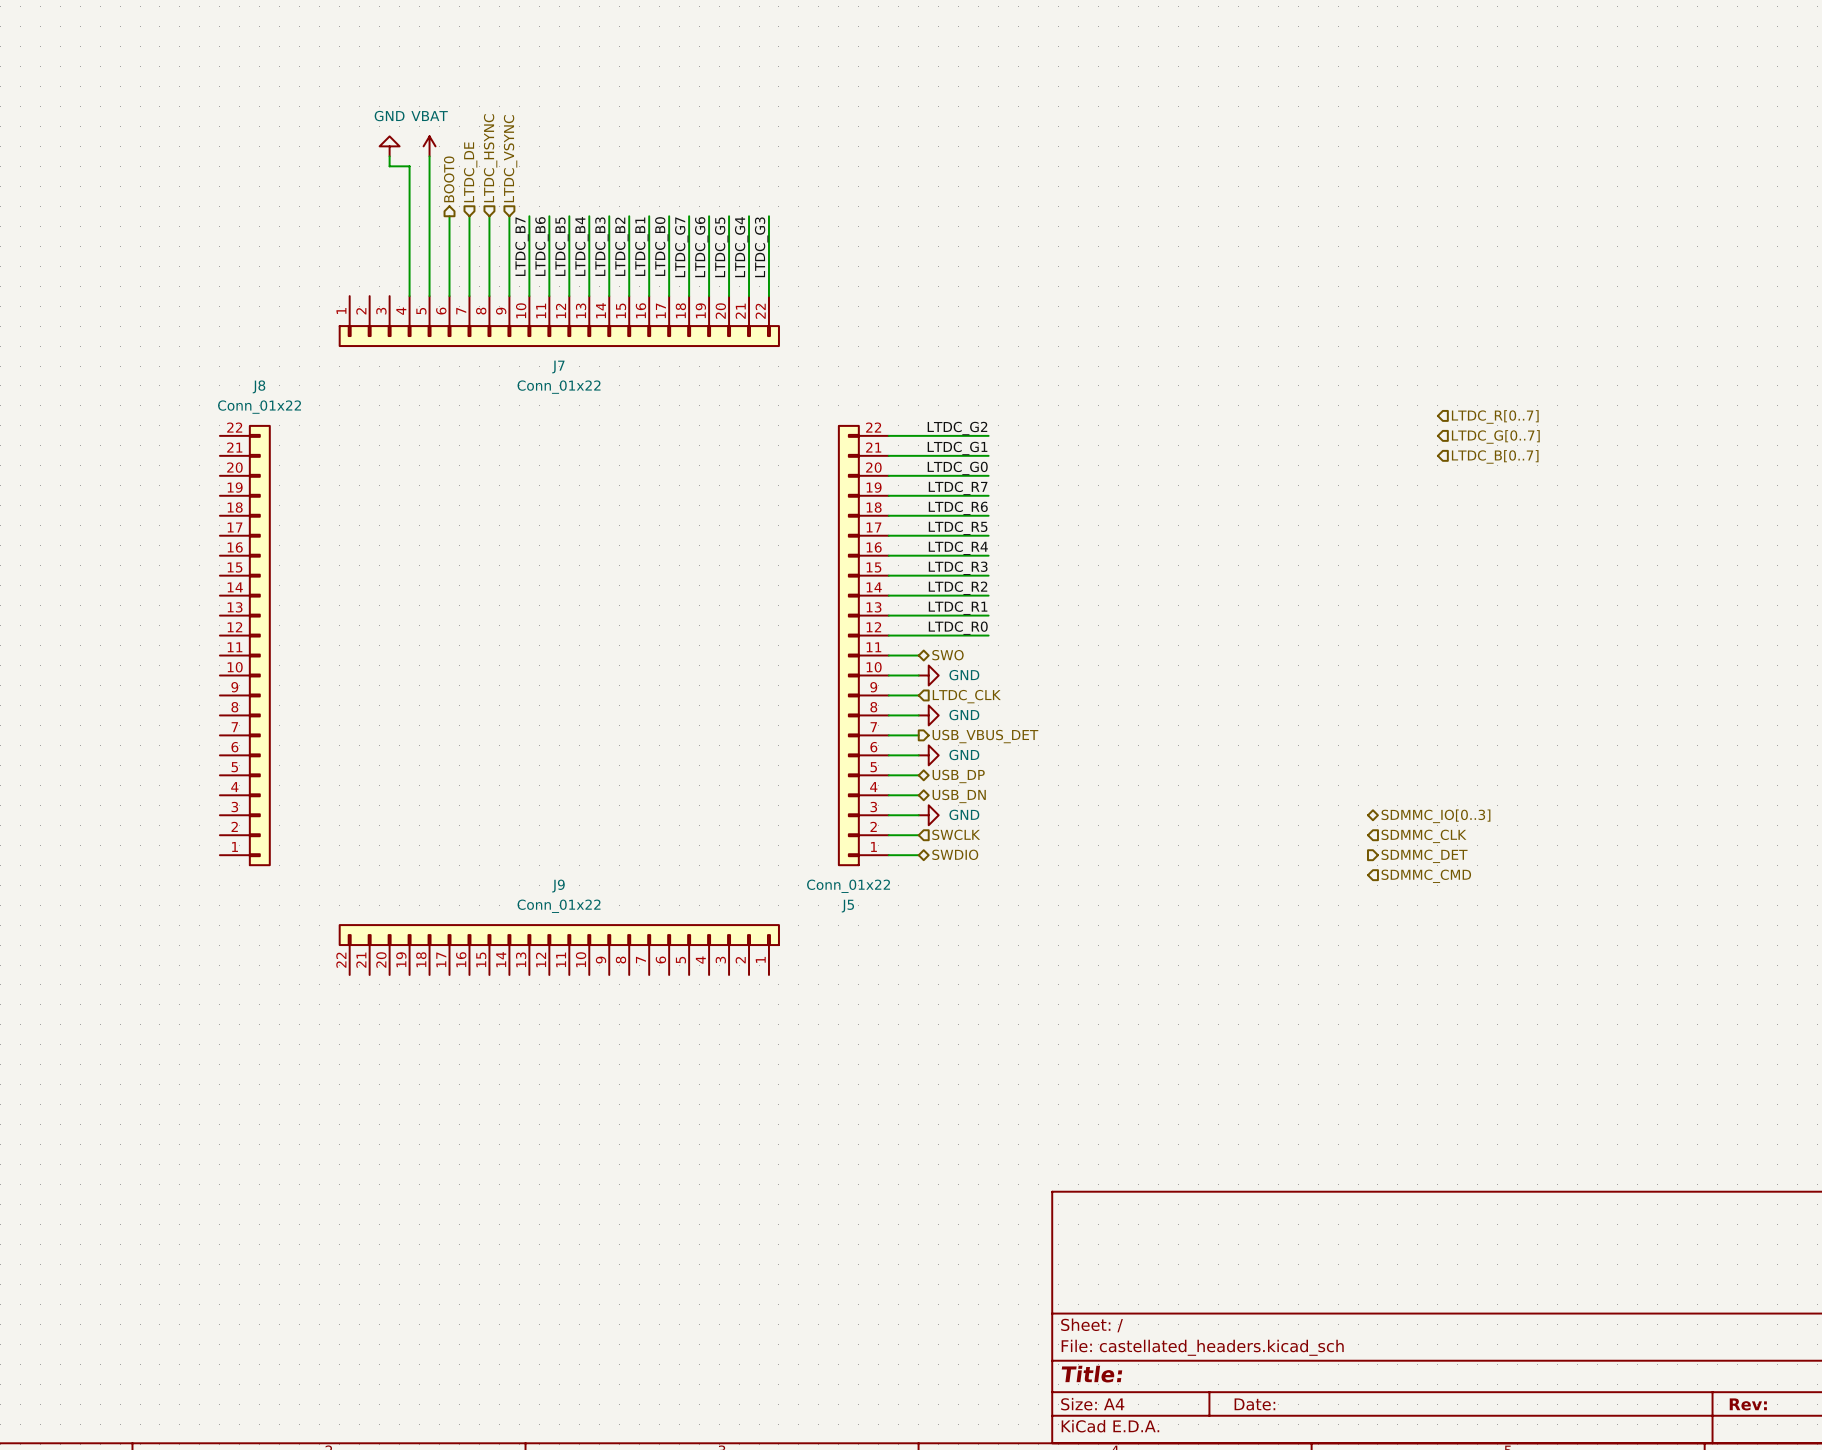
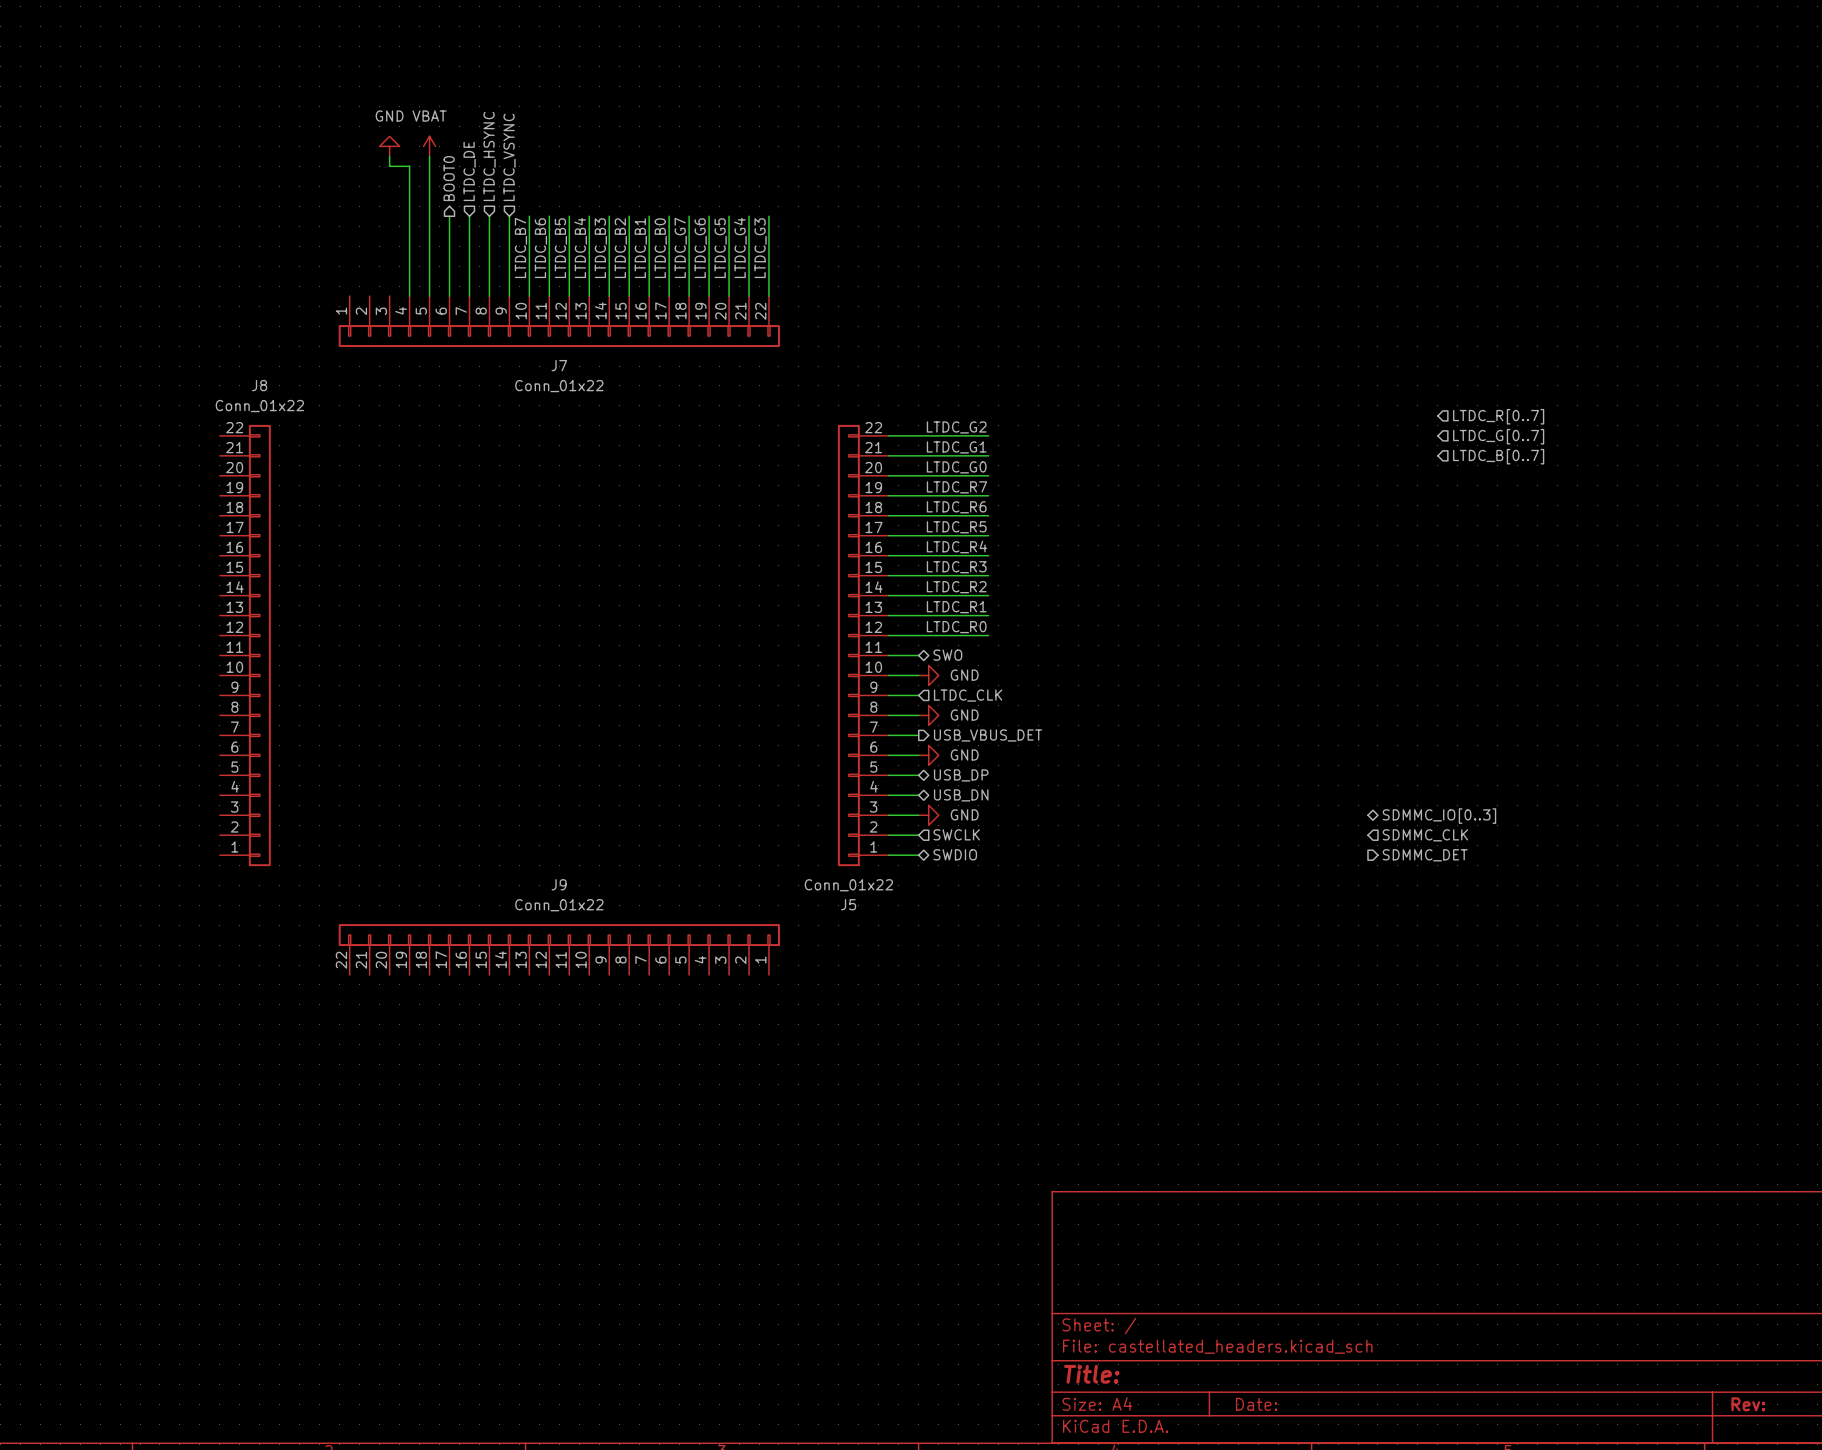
hierarchical label: SDMMC_CMD (1426, 876) -> none

